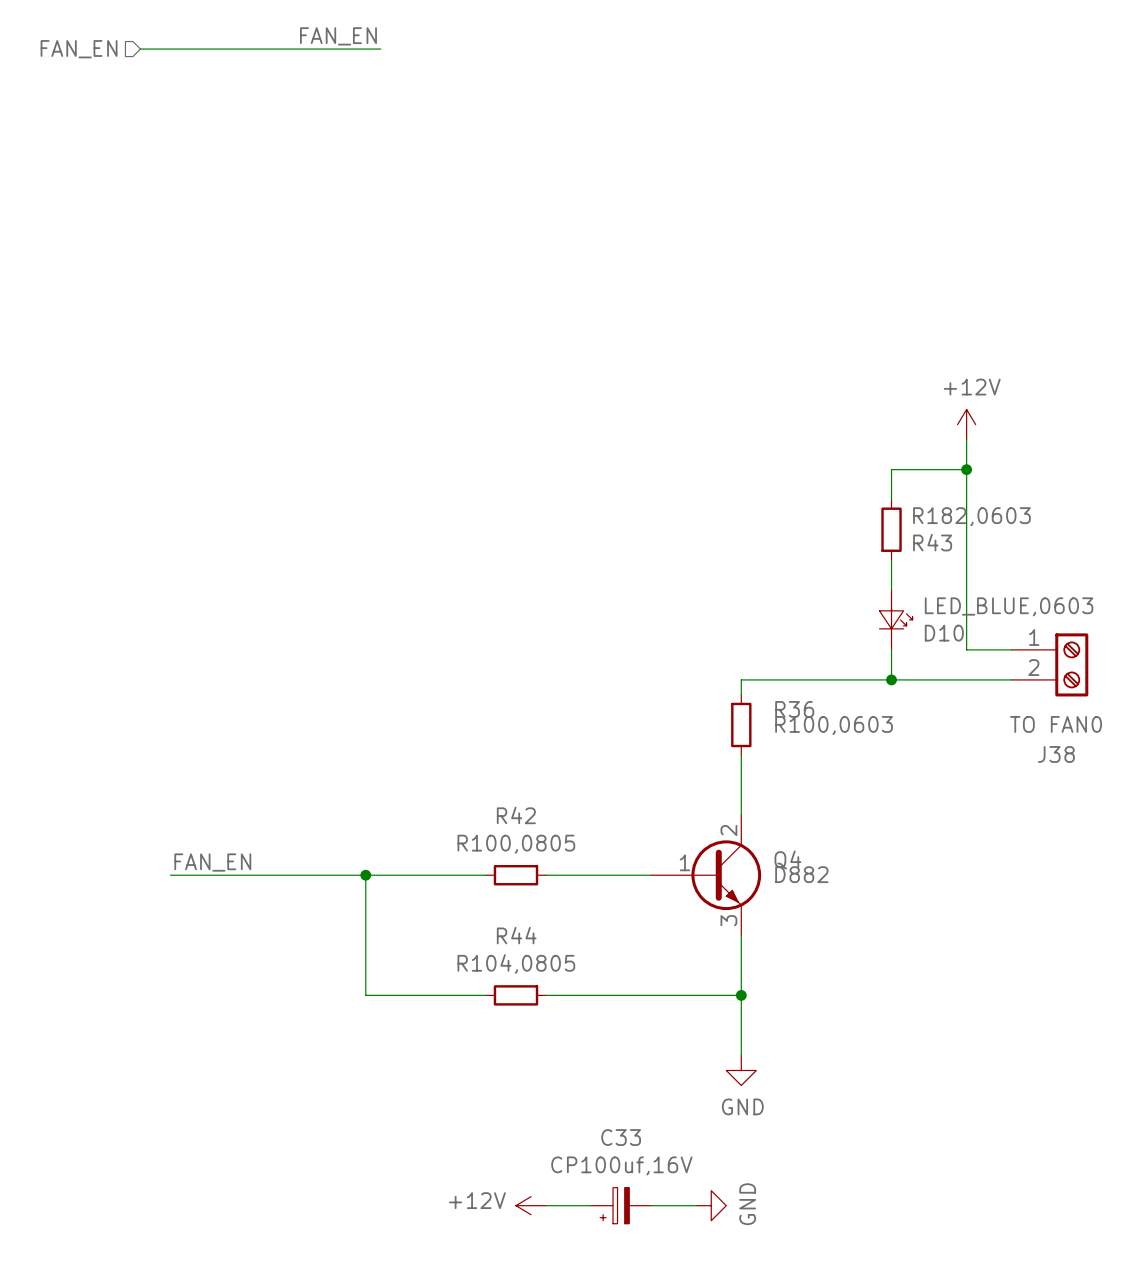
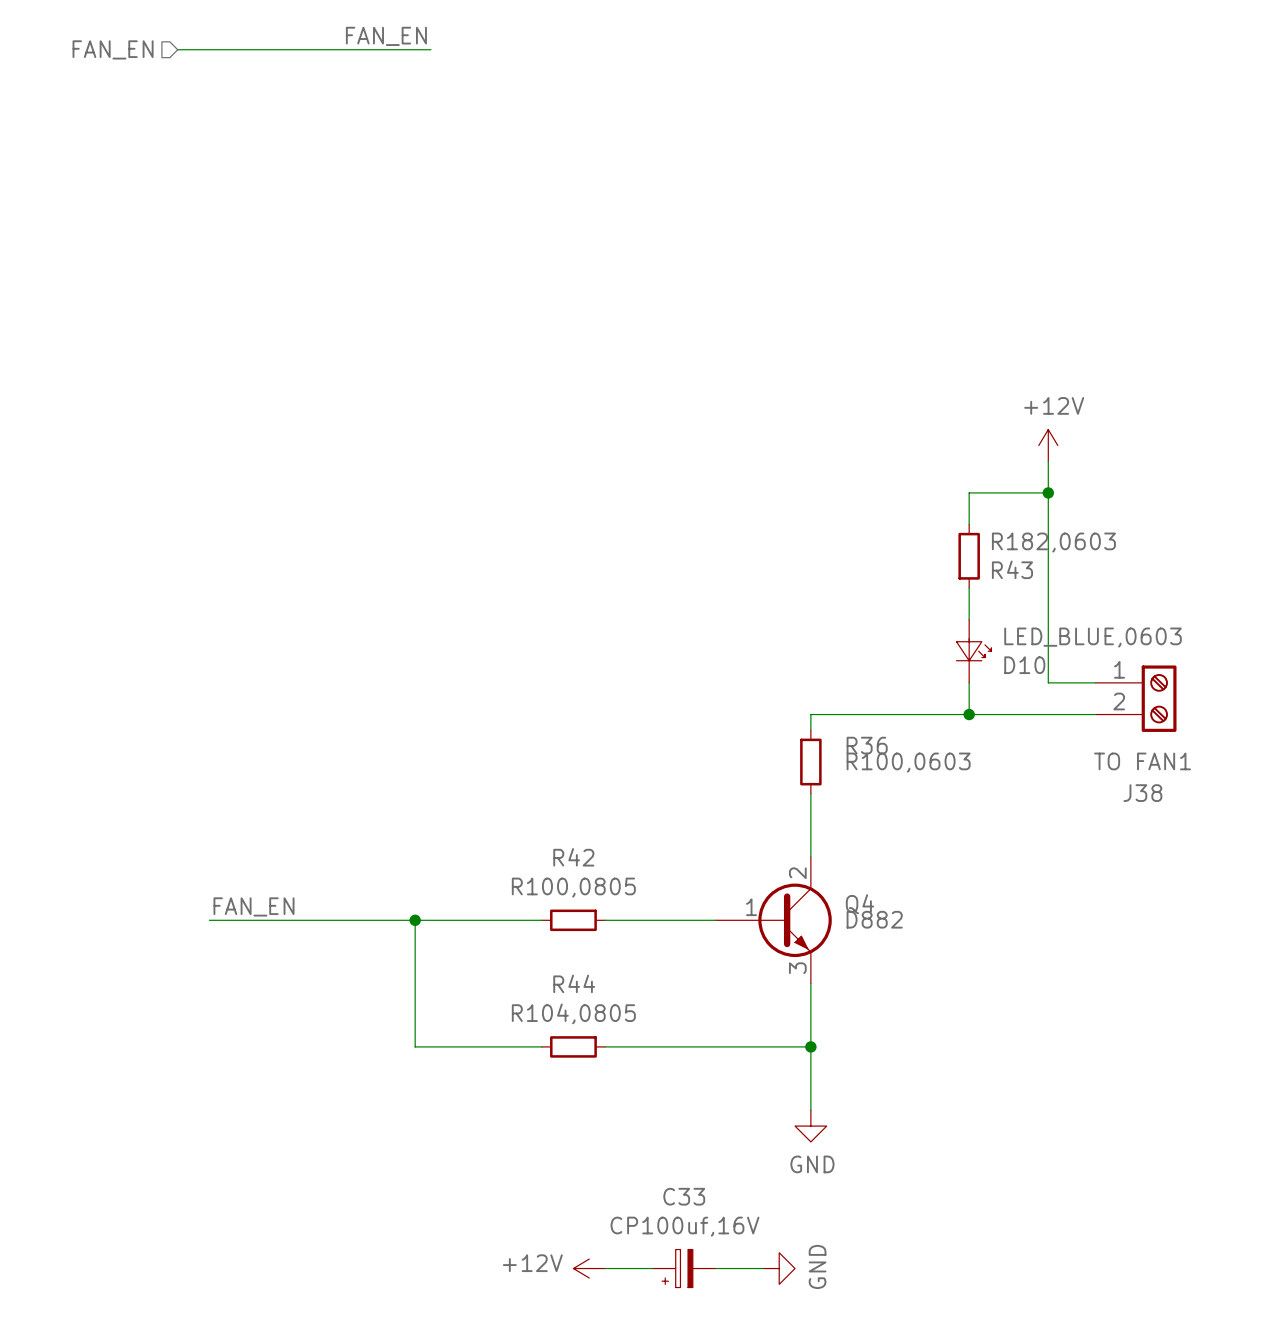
J38 value: TO FAN0 (1056, 724) -> TO FAN1 (1142, 761)

